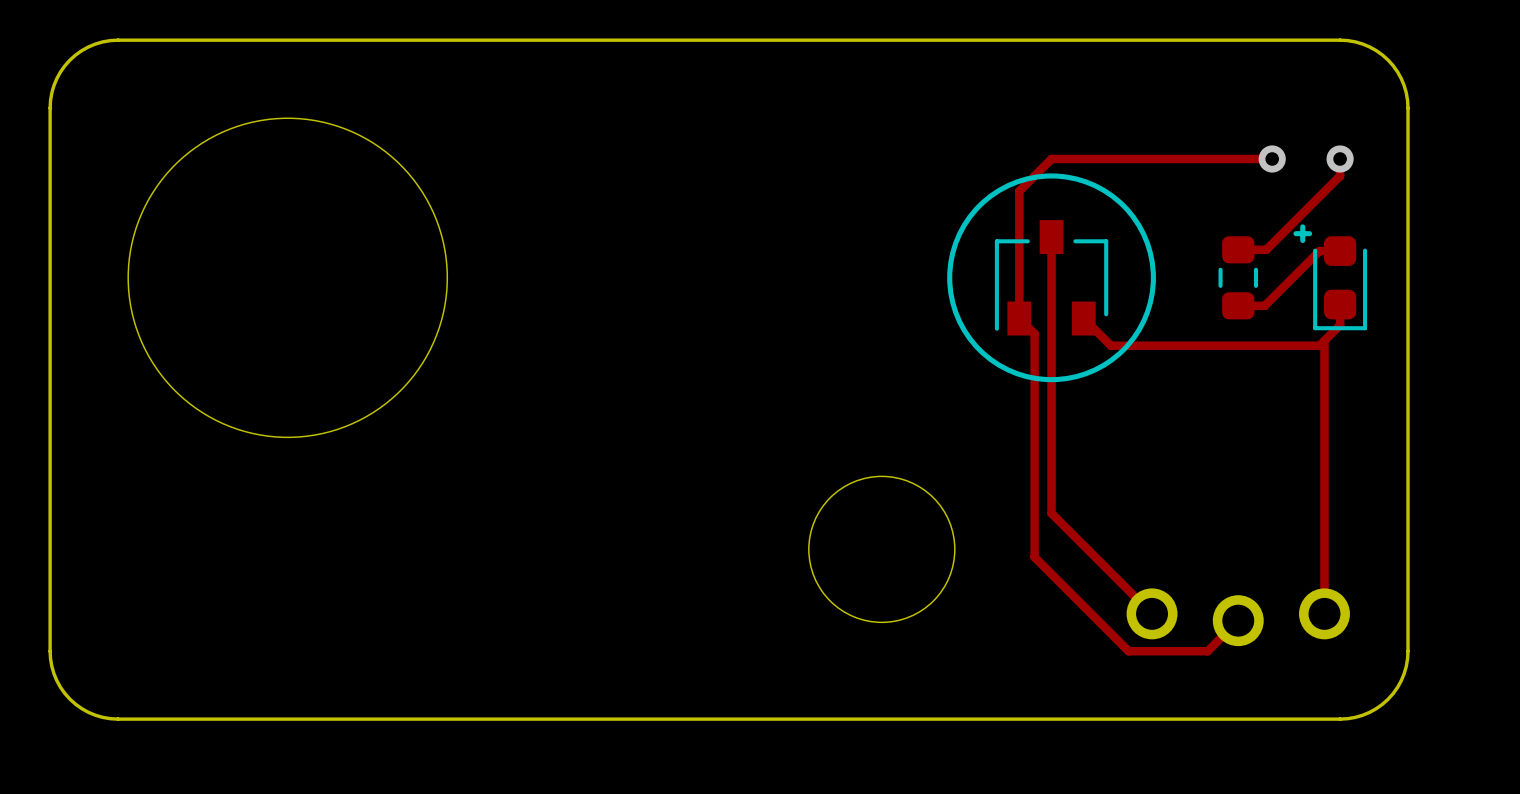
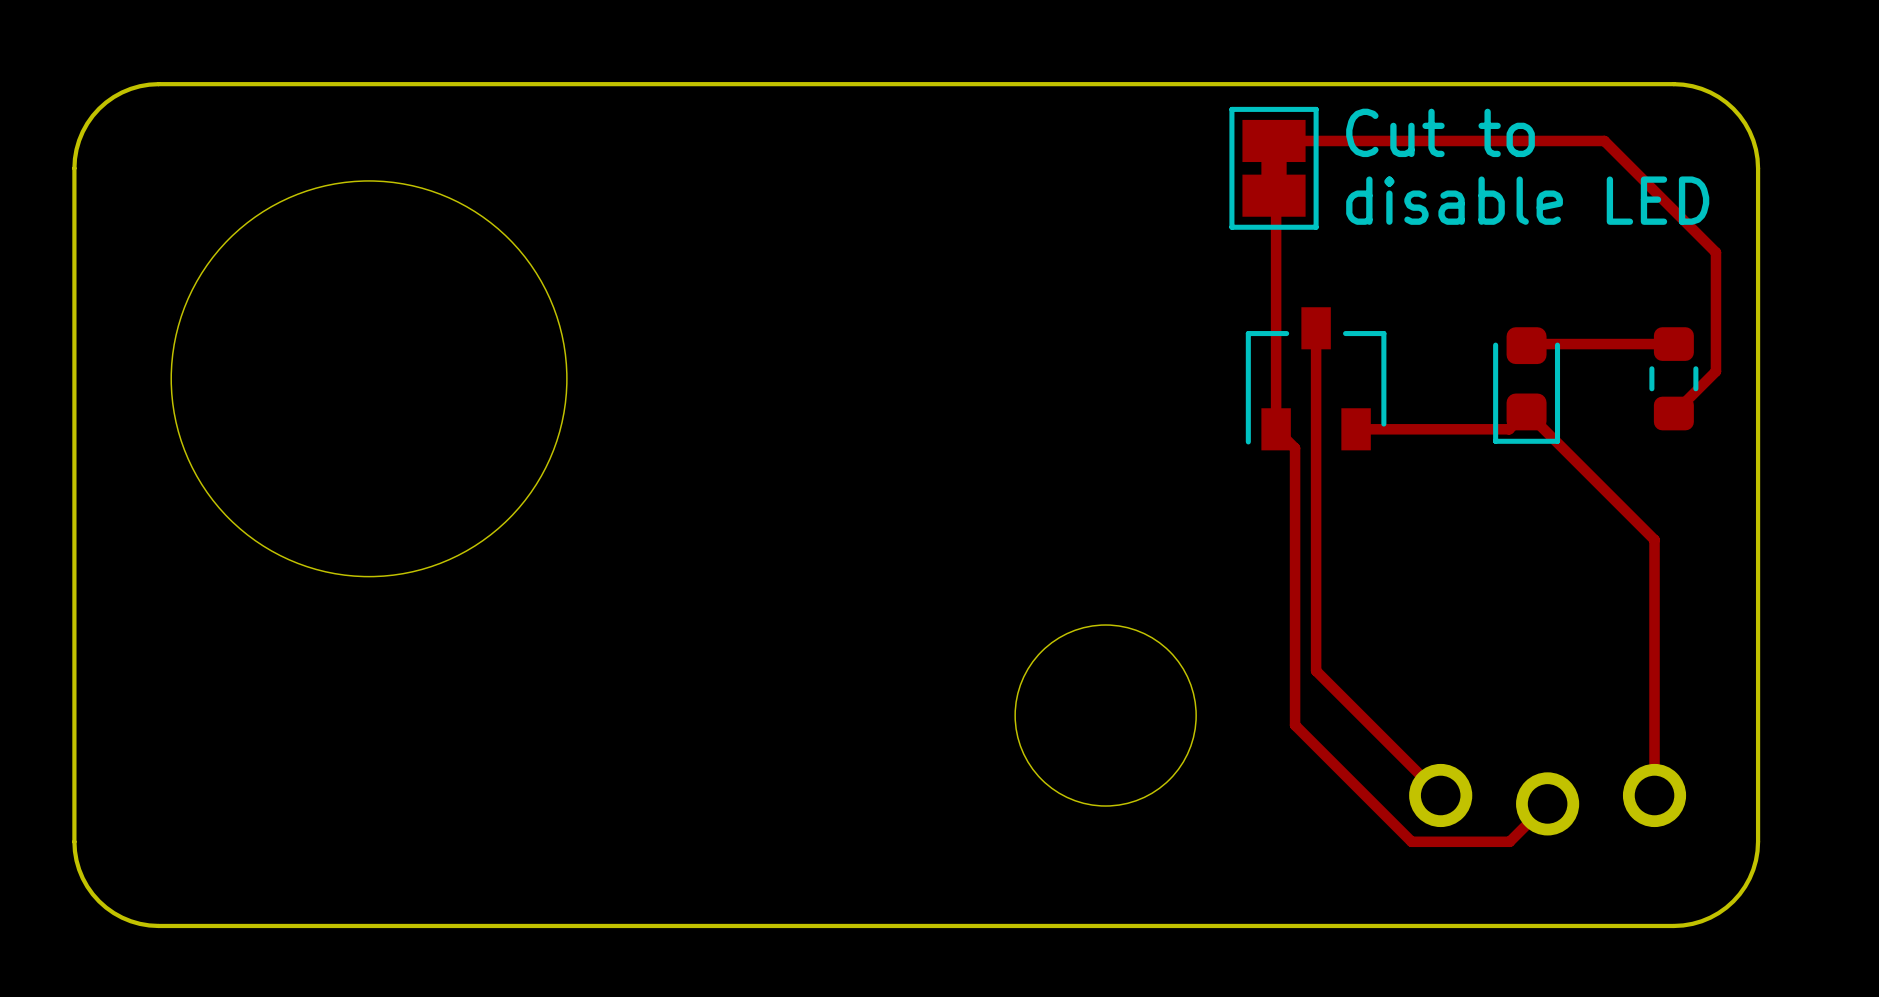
text: none -> Cut to (1440, 132)
track: none -> (1274, 140) (1604, 140) (1715, 252) (1715, 371) (1673, 413)
part: none -> (1274, 168)
text: none -> disable LED (1527, 200)
track: (1272, 158) (1051, 158) (1019, 191) -> (1274, 195) (1276, 197) (1276, 271)
via: (1272, 158) -> none
track: (1340, 158) (1340, 175) (1266, 249) -> none
via: (1340, 158) -> none
drawing: [947, 173, 1156, 383] -> none
line: (1302, 226) (1302, 240) -> none
line: (1295, 233) (1309, 233) -> none
part footprint: [1218, 236, 1259, 320] -> [1493, 327, 1561, 444]
part footprint: [1313, 236, 1368, 331] -> [1649, 327, 1699, 431]
track: (1340, 251) (1319, 251) (1264, 305) (1238, 305) -> (1673, 344) (1582, 344)
track: (1340, 304) (1340, 325) (1319, 345) (1110, 345) (1083, 318) -> (1654, 539) (1526, 411) (1509, 429) (1356, 429)
track: (1324, 340) (1324, 407) -> none

